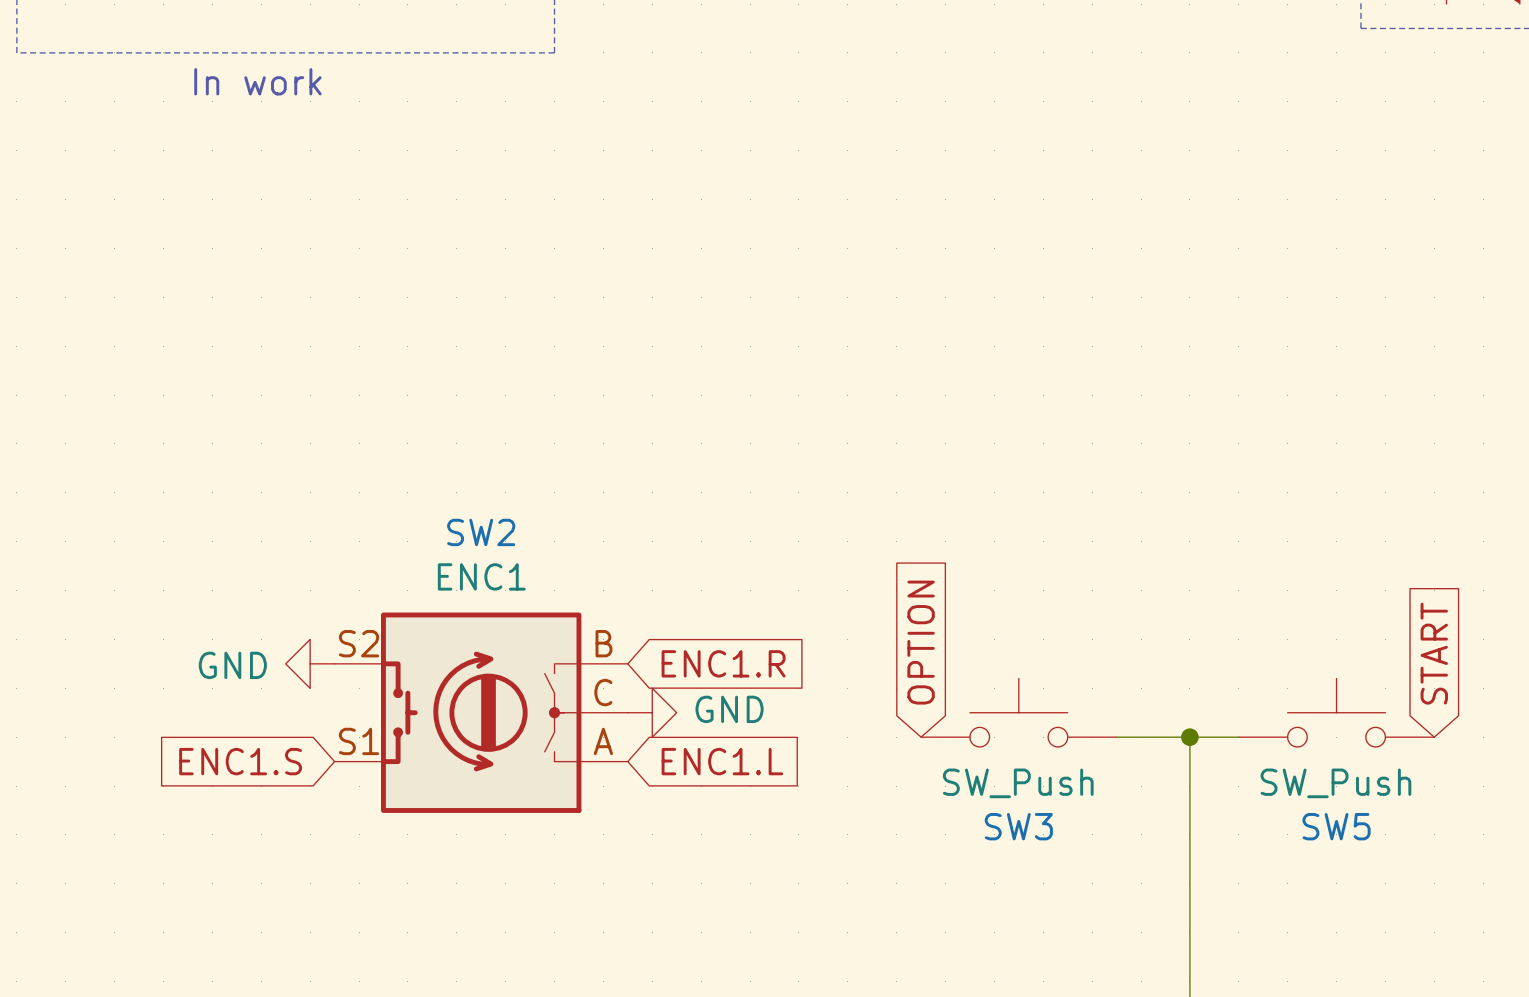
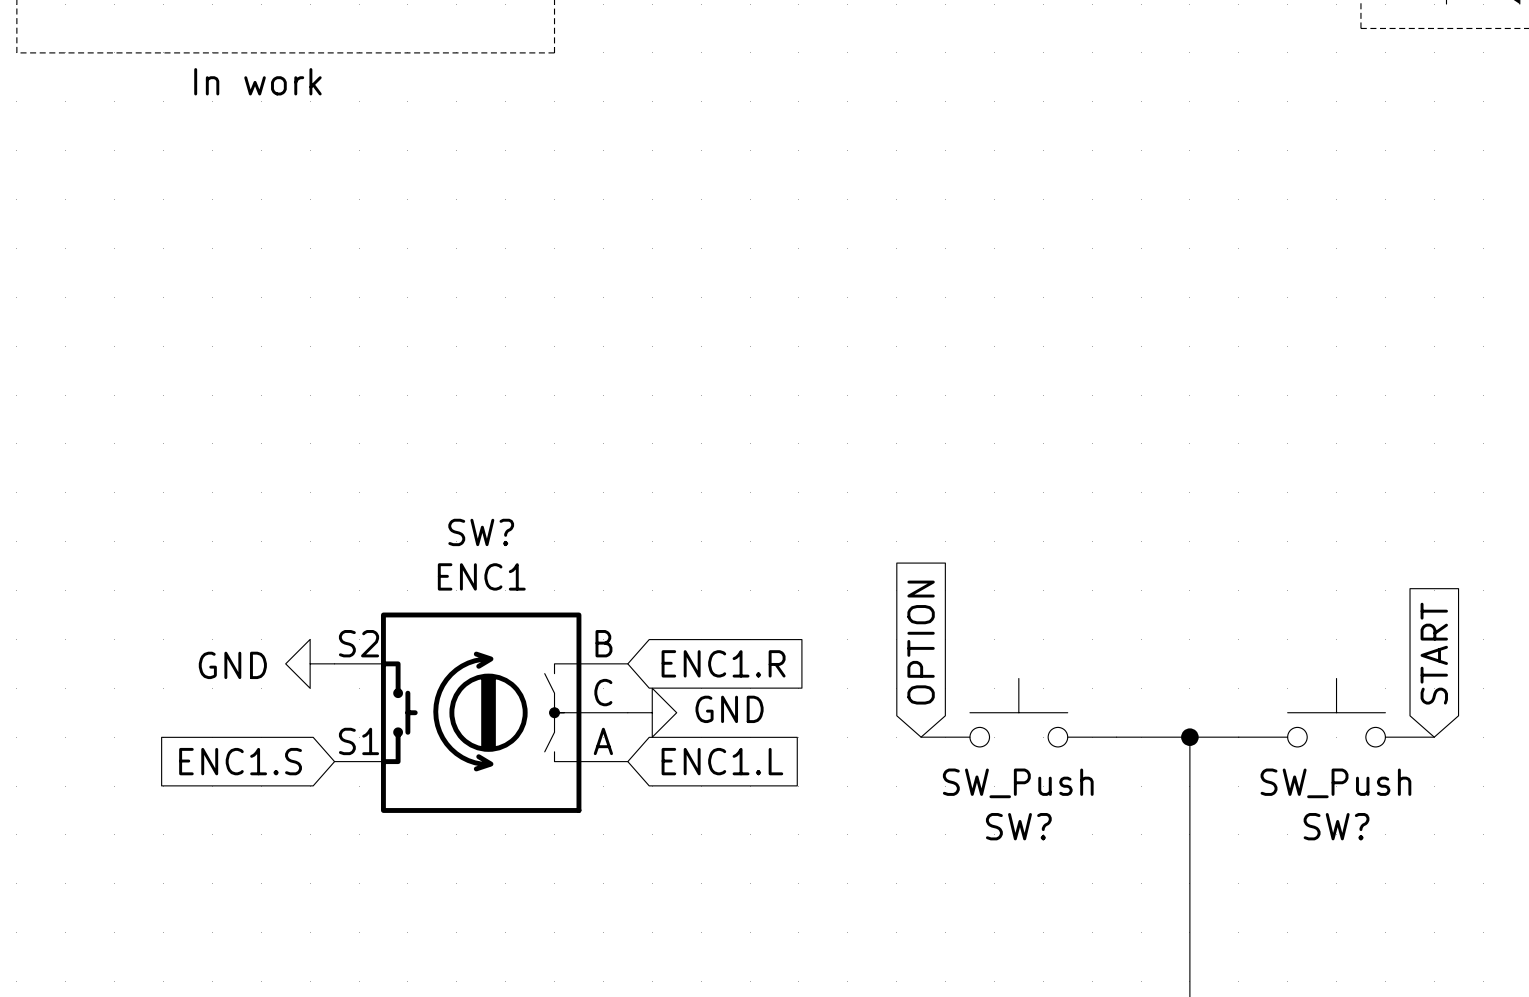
SW2 name: SW2 (481, 532) -> SW? (481, 532)
SW3 name: SW3 (1018, 826) -> SW? (1018, 826)
SW5 name: SW5 (1336, 826) -> SW? (1336, 826)

